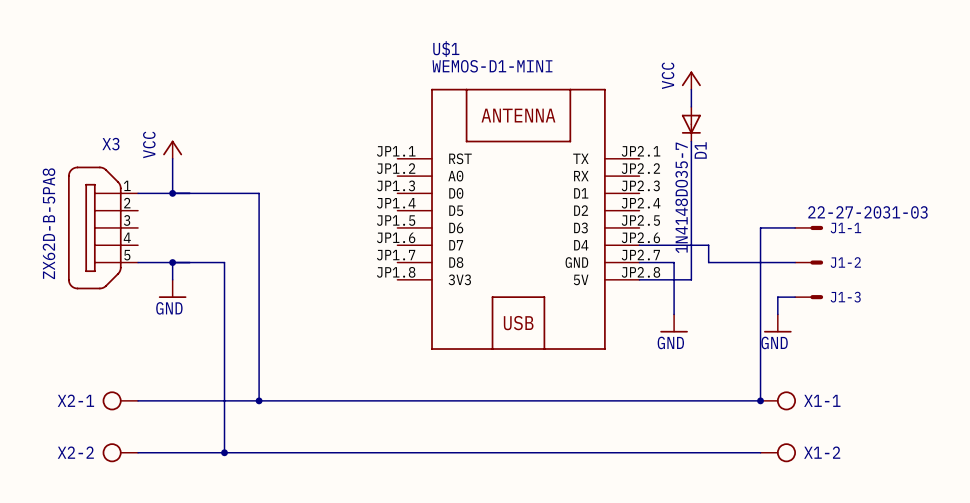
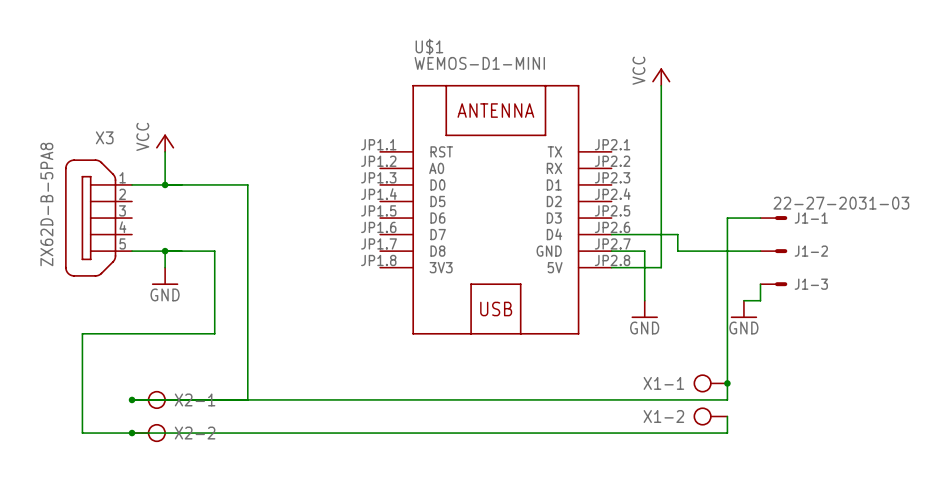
D1: 1N4148DO35-7 (691, 124) -> none
wire: (795, 297) (777, 297) (777, 314) -> (760, 284) (760, 300) (743, 300)
wire: (224, 349) (224, 452) -> (214, 333) (82, 333) (82, 433) (132, 433)
X2-1 rotation: 0° (112, 400) -> 180° (156, 399)
X2-1 position: (120, 400) -> (148, 399)
wire: (138, 400) (760, 400) -> (132, 399) (727, 399) (727, 383)
wire: none -> (247, 383) (247, 399)
junction: (259, 400) -> none
X1-1 position: (778, 400) -> (710, 383)
X1-1 rotation: 0° (786, 400) -> 180° (702, 383)
junction: none -> (132, 399)
wire: none -> (727, 416) (727, 433)
X2-2 rotation: 0° (112, 452) -> 180° (156, 433)
X2-2 position: (120, 452) -> (148, 433)
junction: none -> (132, 433)
junction: (224, 452) -> none
X1-2 position: (778, 452) -> (710, 416)
X1-2 rotation: 0° (786, 452) -> 180° (702, 416)

